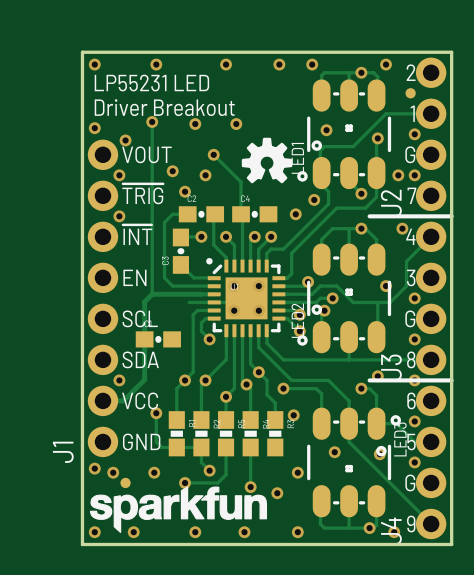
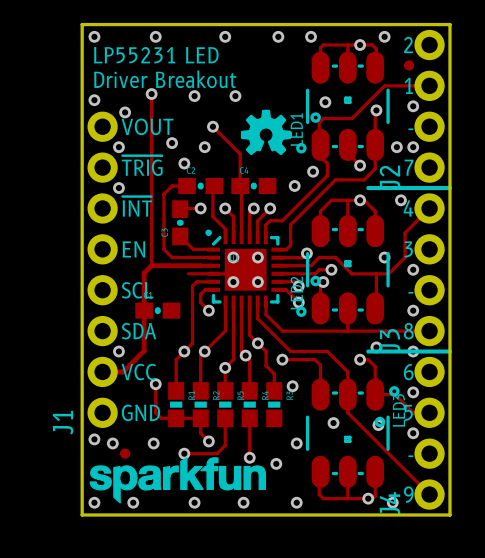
text: G (410, 154) -> - (410, 129)
text: G (410, 318) -> - (410, 292)
text: G (410, 482) -> - (410, 456)

